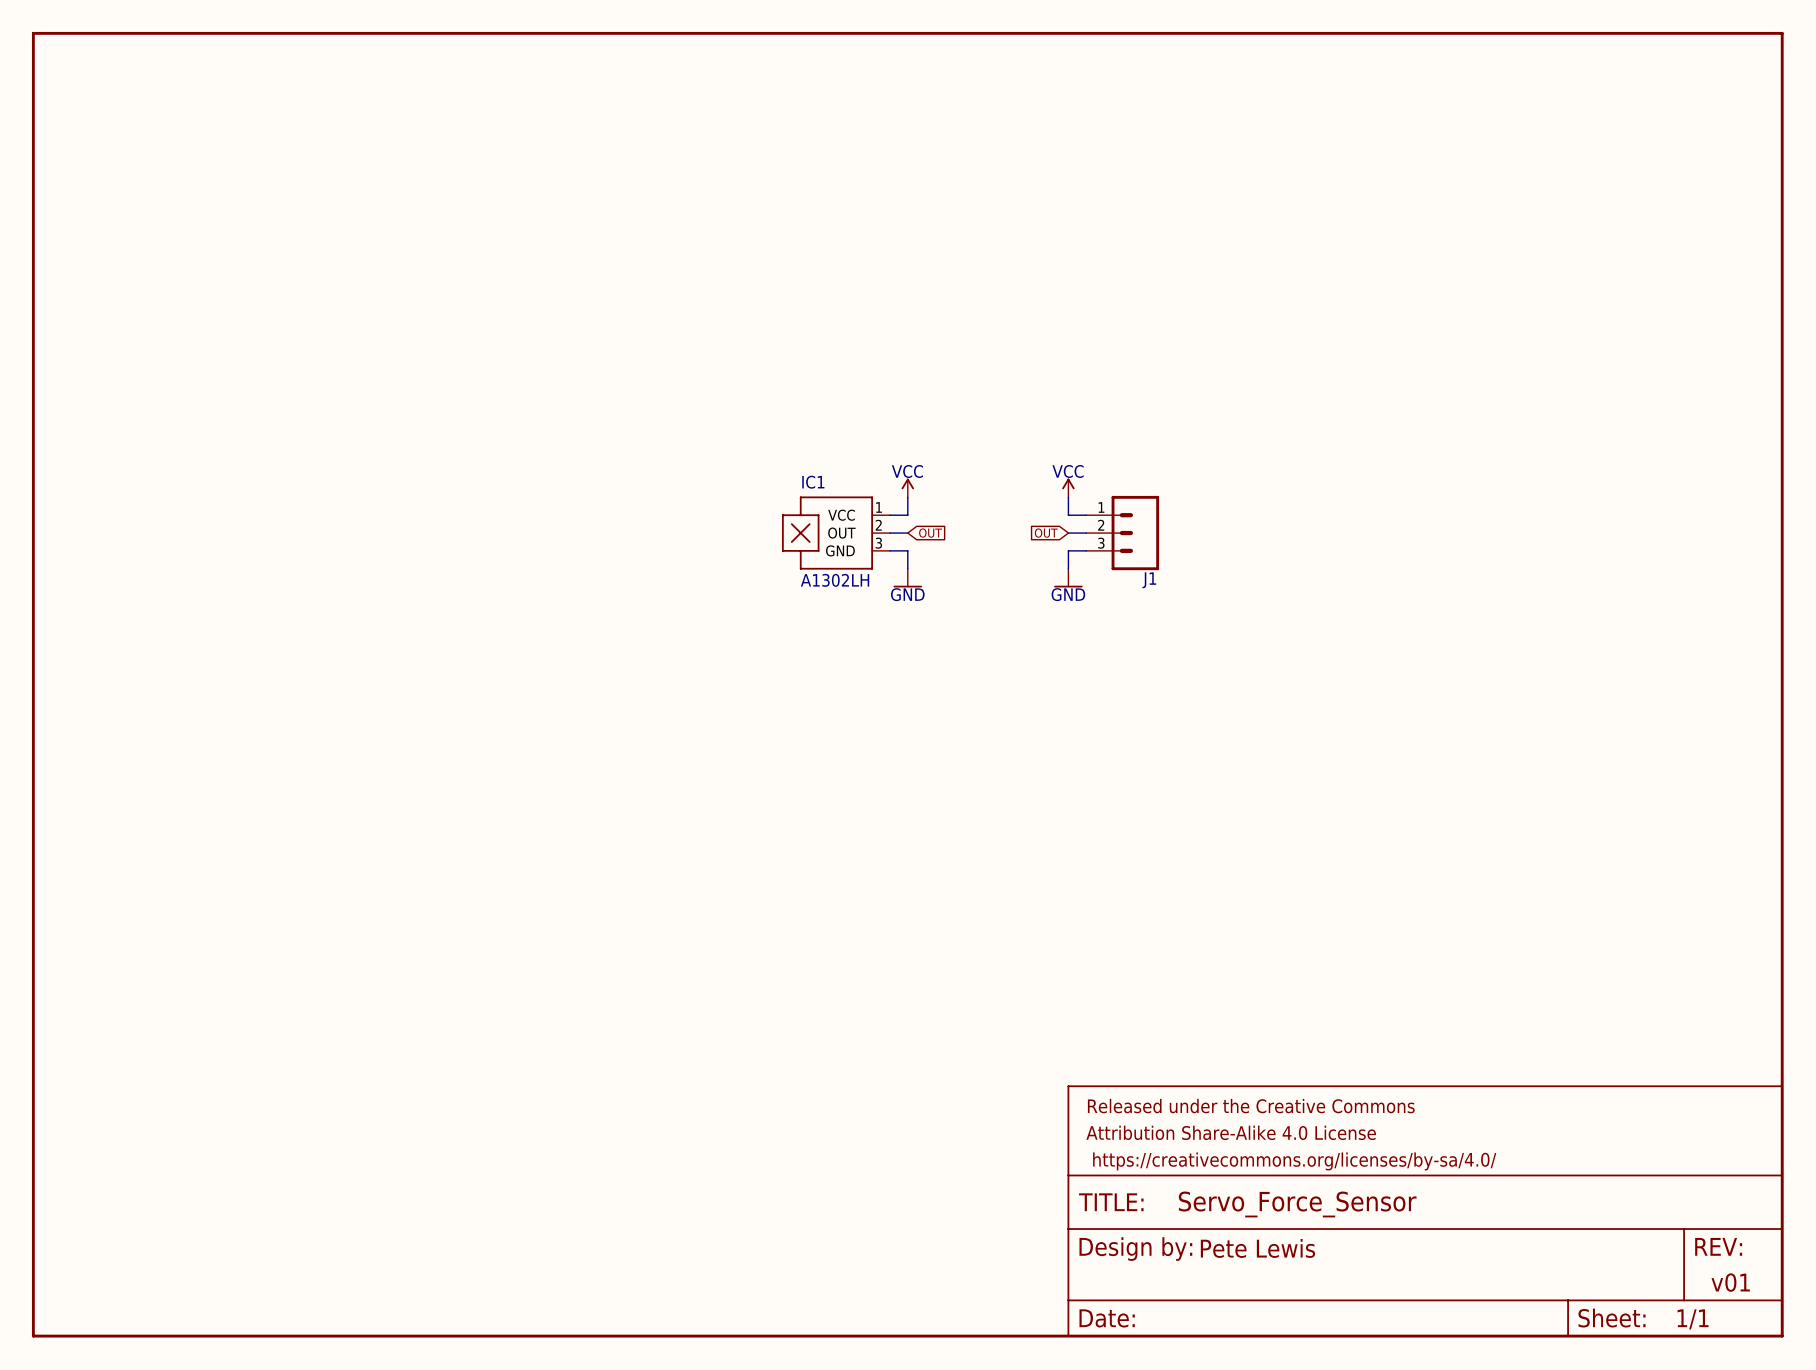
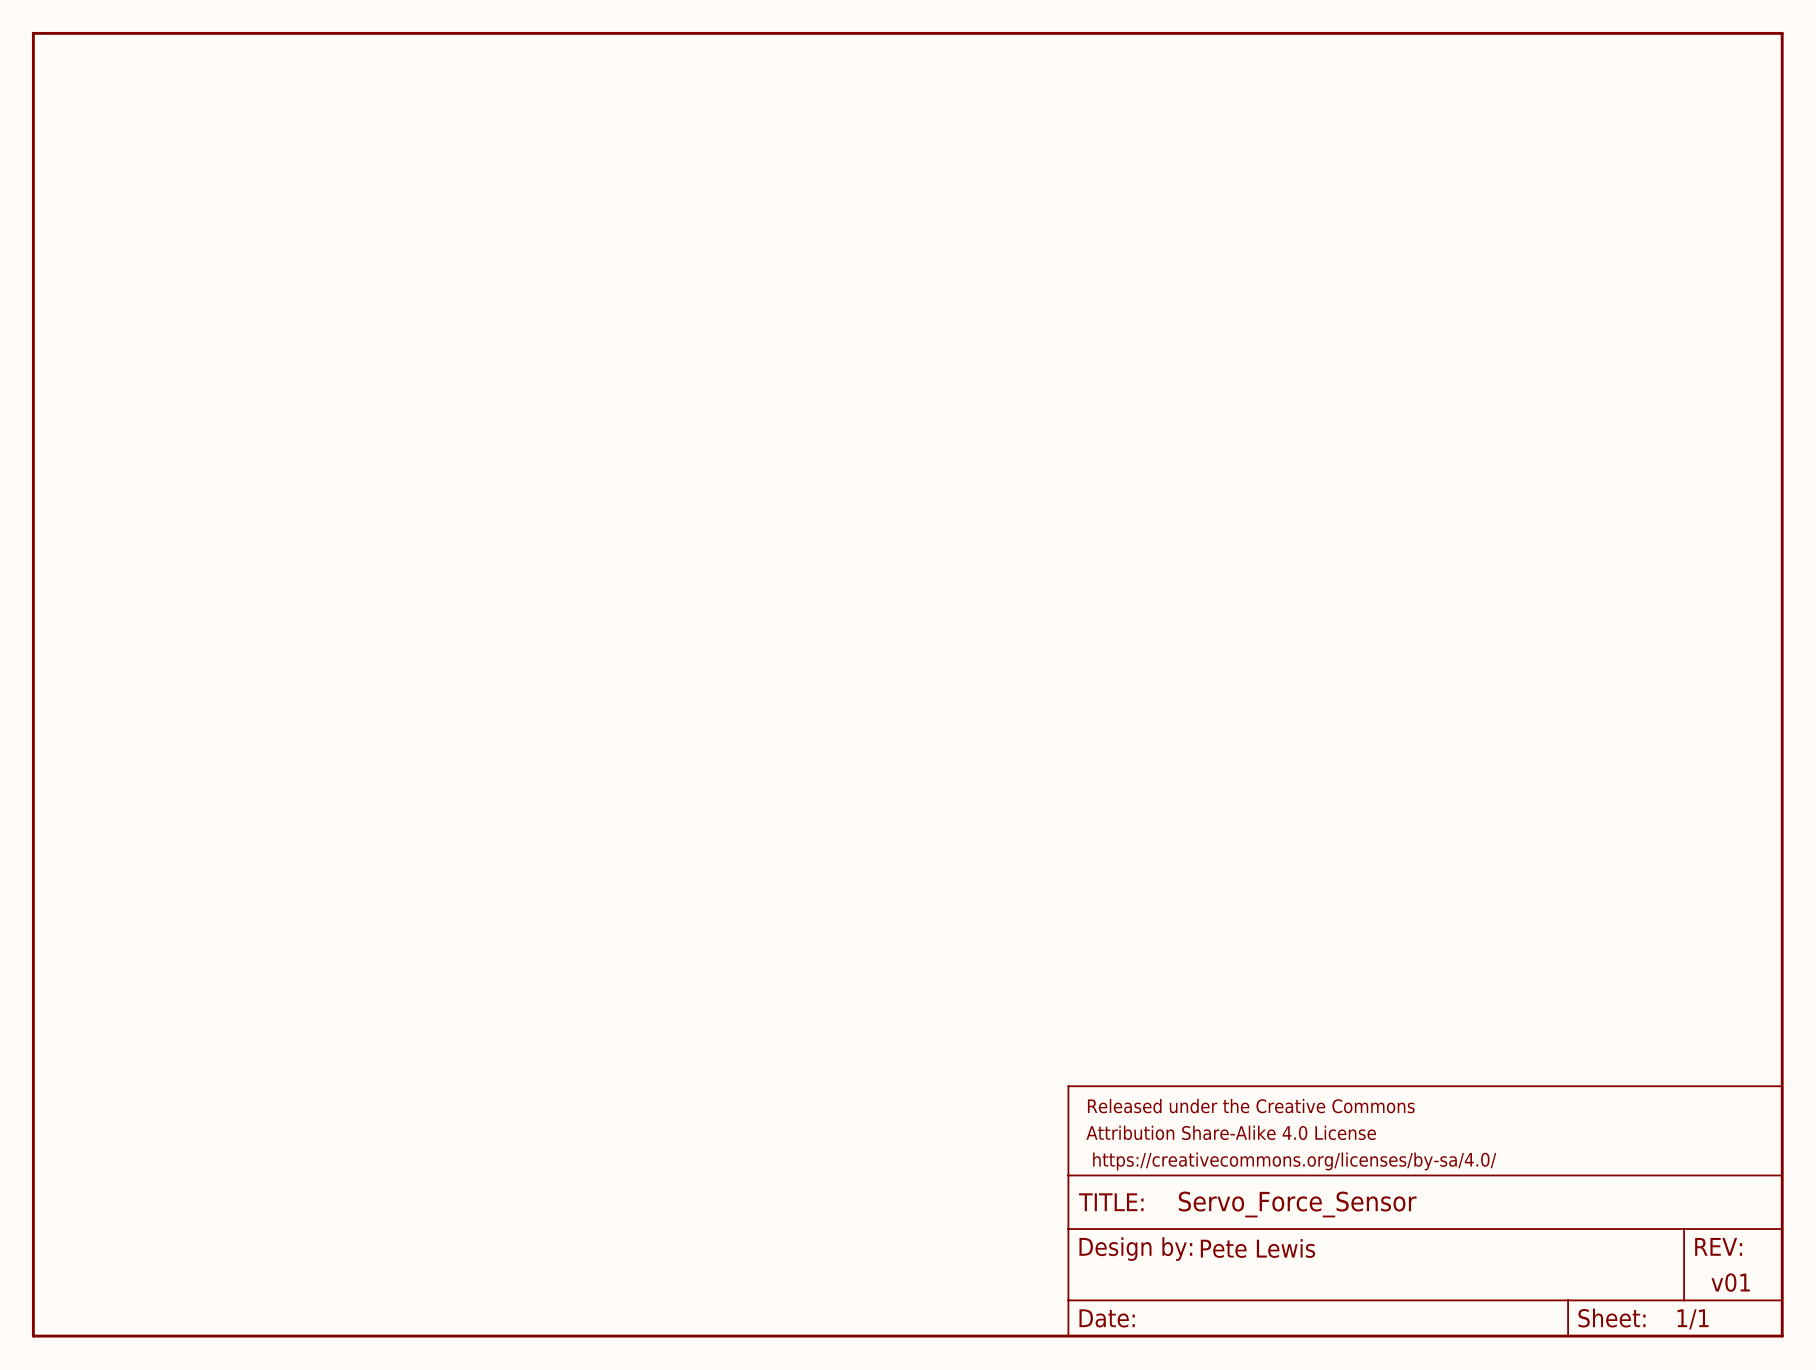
power symbol: VCC (907, 487) -> none
power symbol: VCC (1068, 487) -> none
wire: (907, 497) (907, 515) (889, 515) -> none
wire: (1068, 497) (1068, 515) (1086, 515) -> none
IC1: A1302LH (835, 533) -> none
wire: (889, 533) (907, 533) -> none
global label: OUT (930, 533) -> none
global label: OUT (1046, 533) -> none
wire: (1068, 533) (1086, 533) -> none
J1: (1122, 533) -> none
wire: (889, 550) (907, 550) (907, 568) -> none
wire: (1086, 550) (1068, 550) (1068, 568) -> none
power symbol: GND (907, 578) -> none
power symbol: GND (1068, 578) -> none

